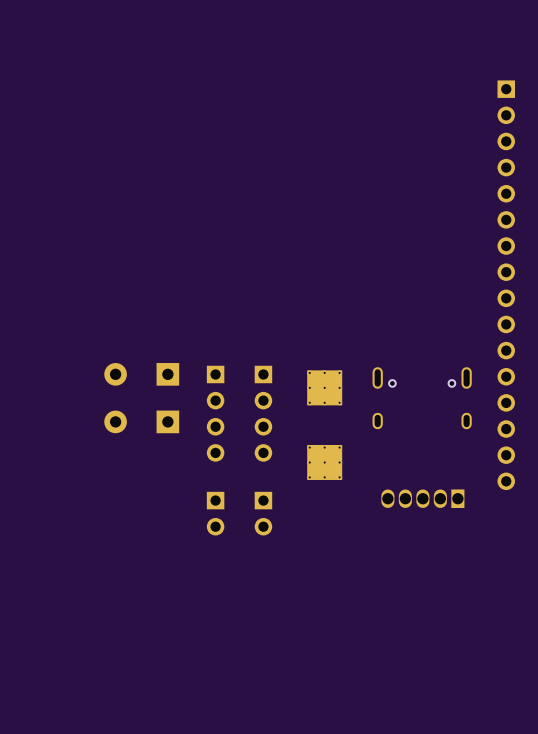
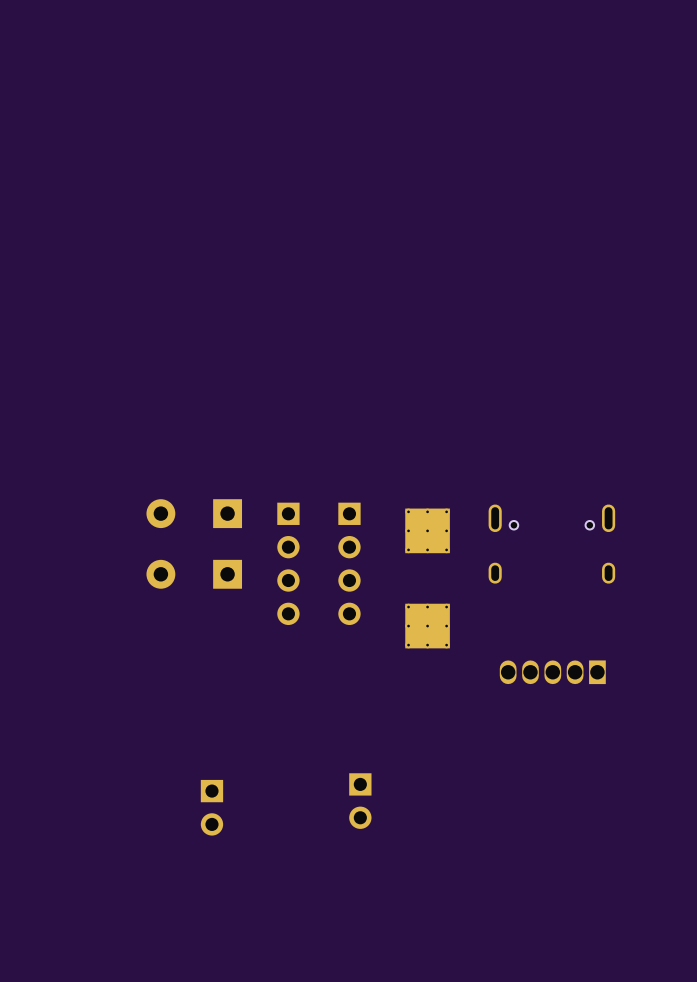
part: (506, 285) -> none
part: (215, 513) -> none
part: (263, 513) -> none
part: none -> (360, 801)
part: none -> (211, 807)

